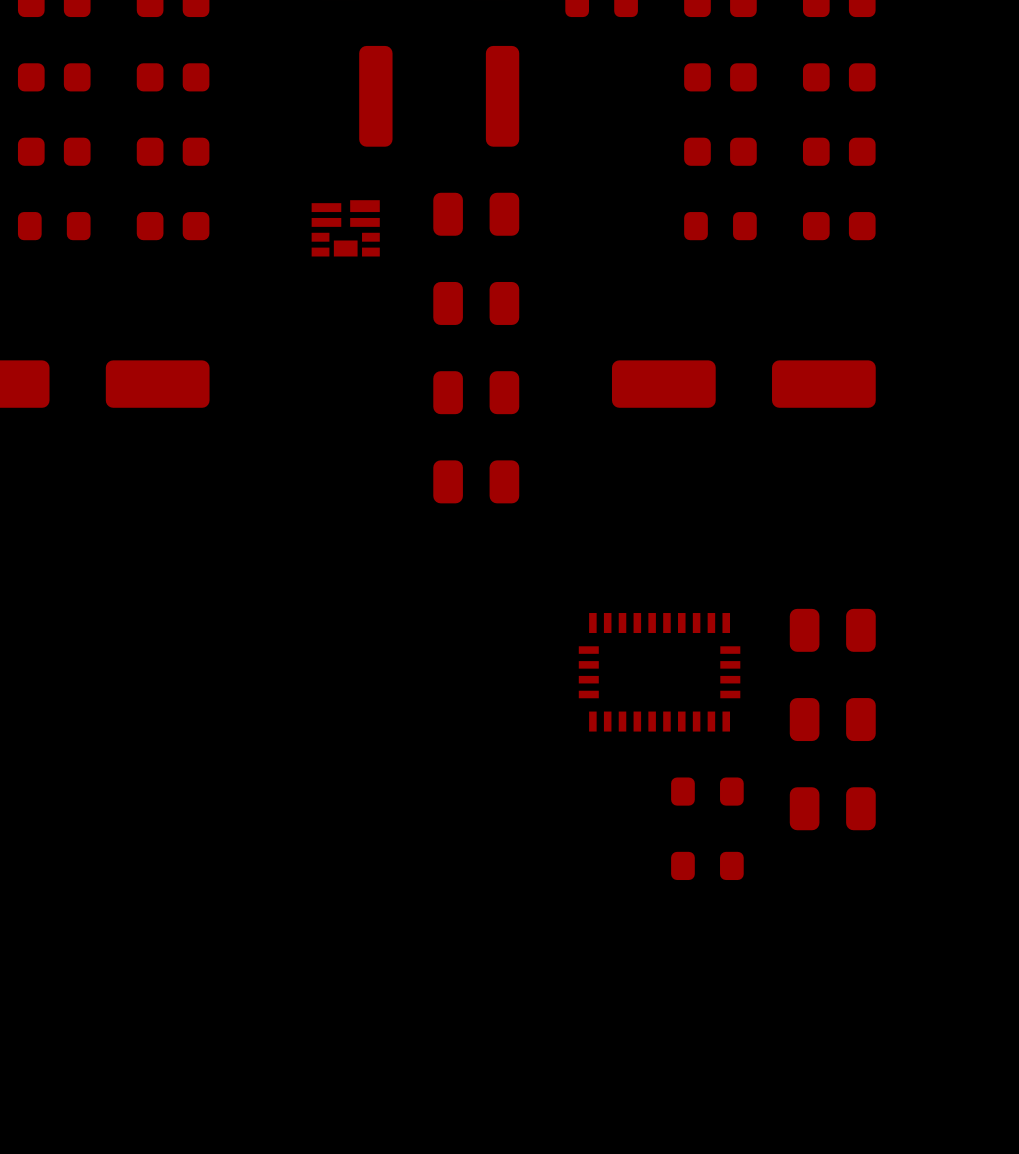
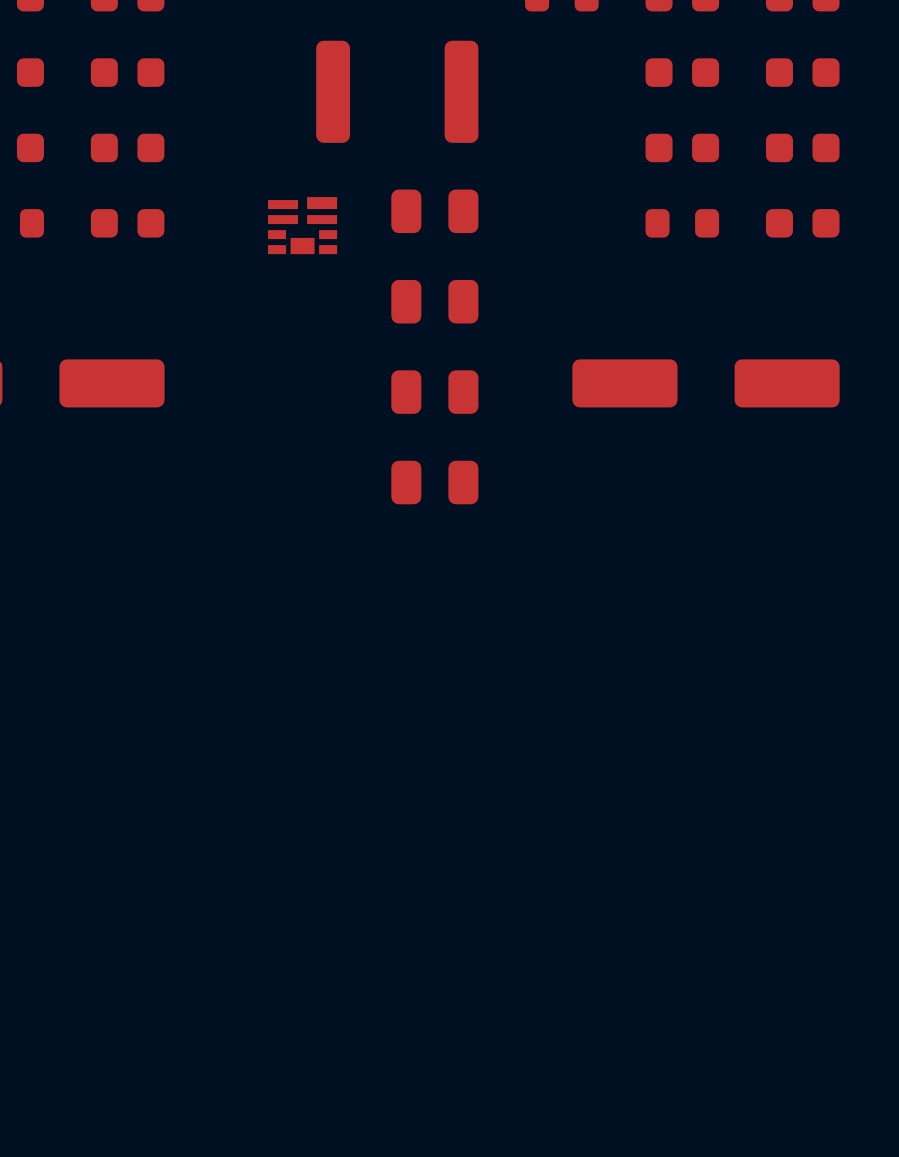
part: (832, 630) -> none
part: (659, 672) -> none
part: (832, 719) -> none
part: (707, 791) -> none
part: (832, 808) -> none
part: (707, 865) -> none

